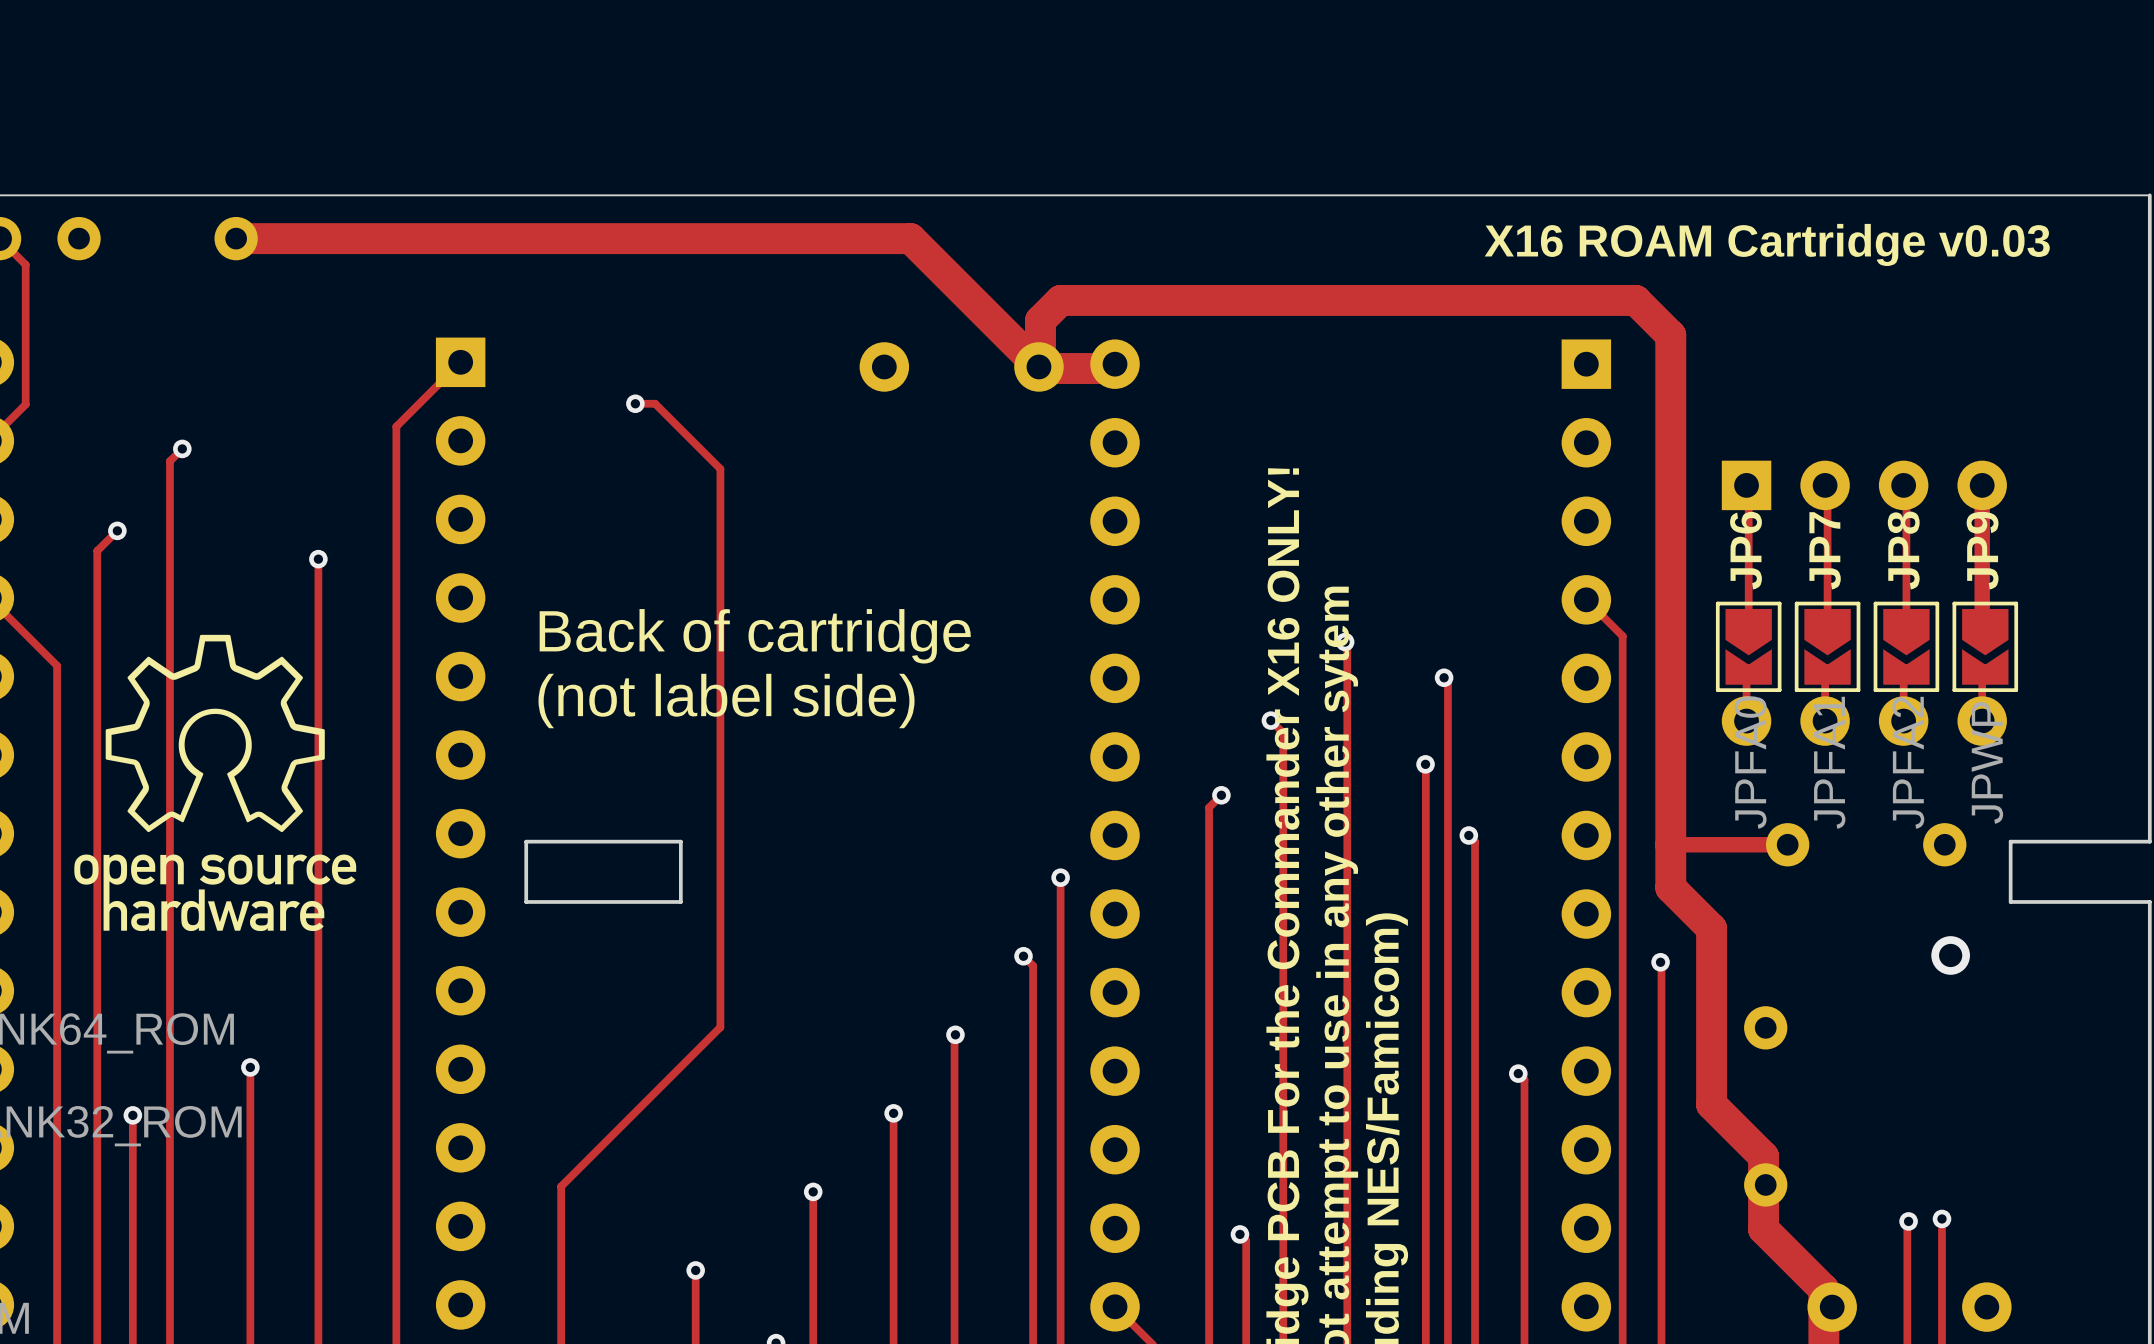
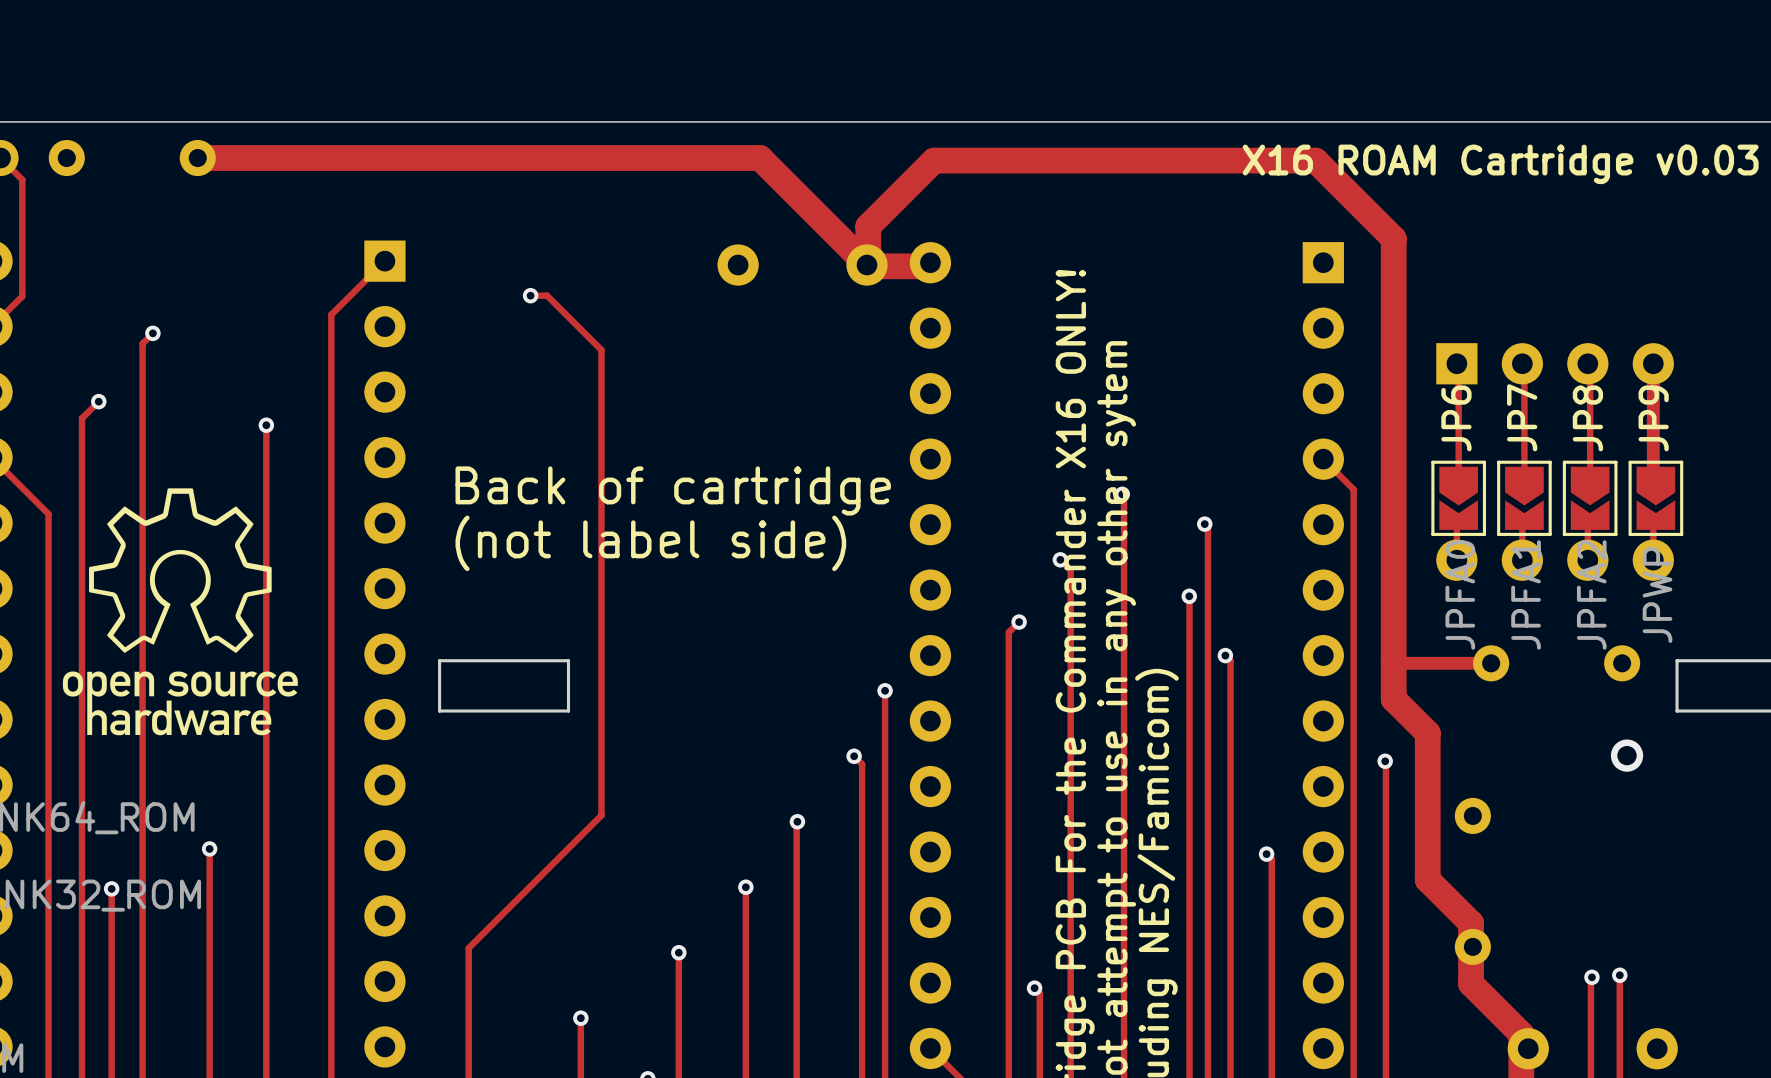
track: (1060, 300) (1635, 300) -> (885, 209) (934, 160) (1315, 160) (1364, 209)

